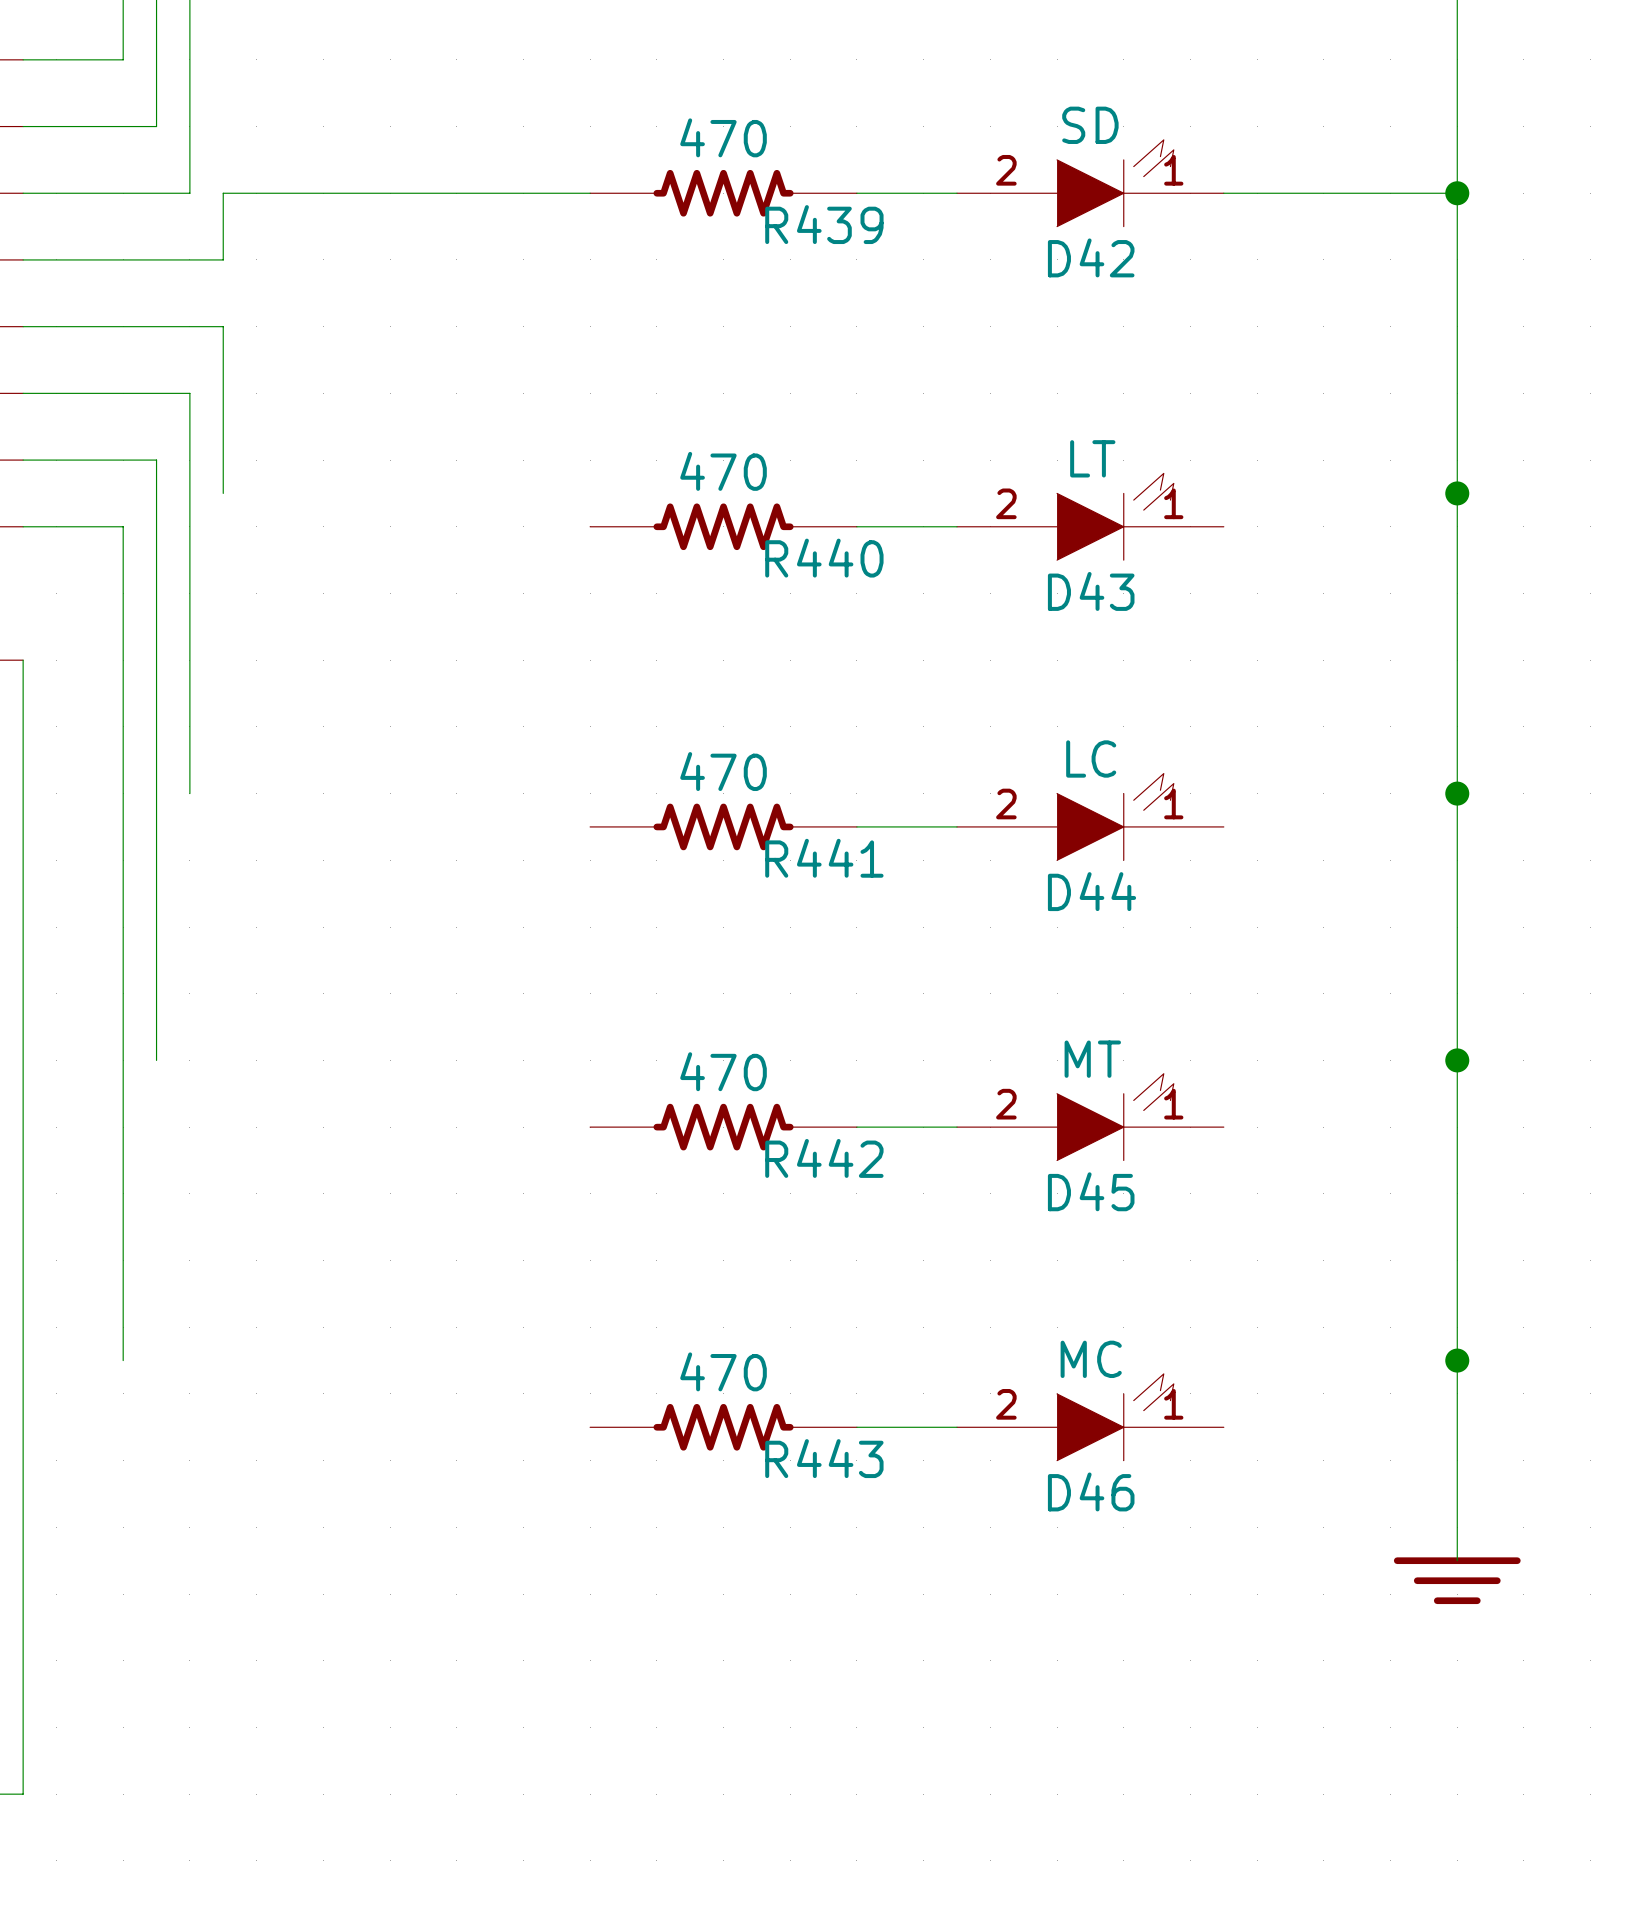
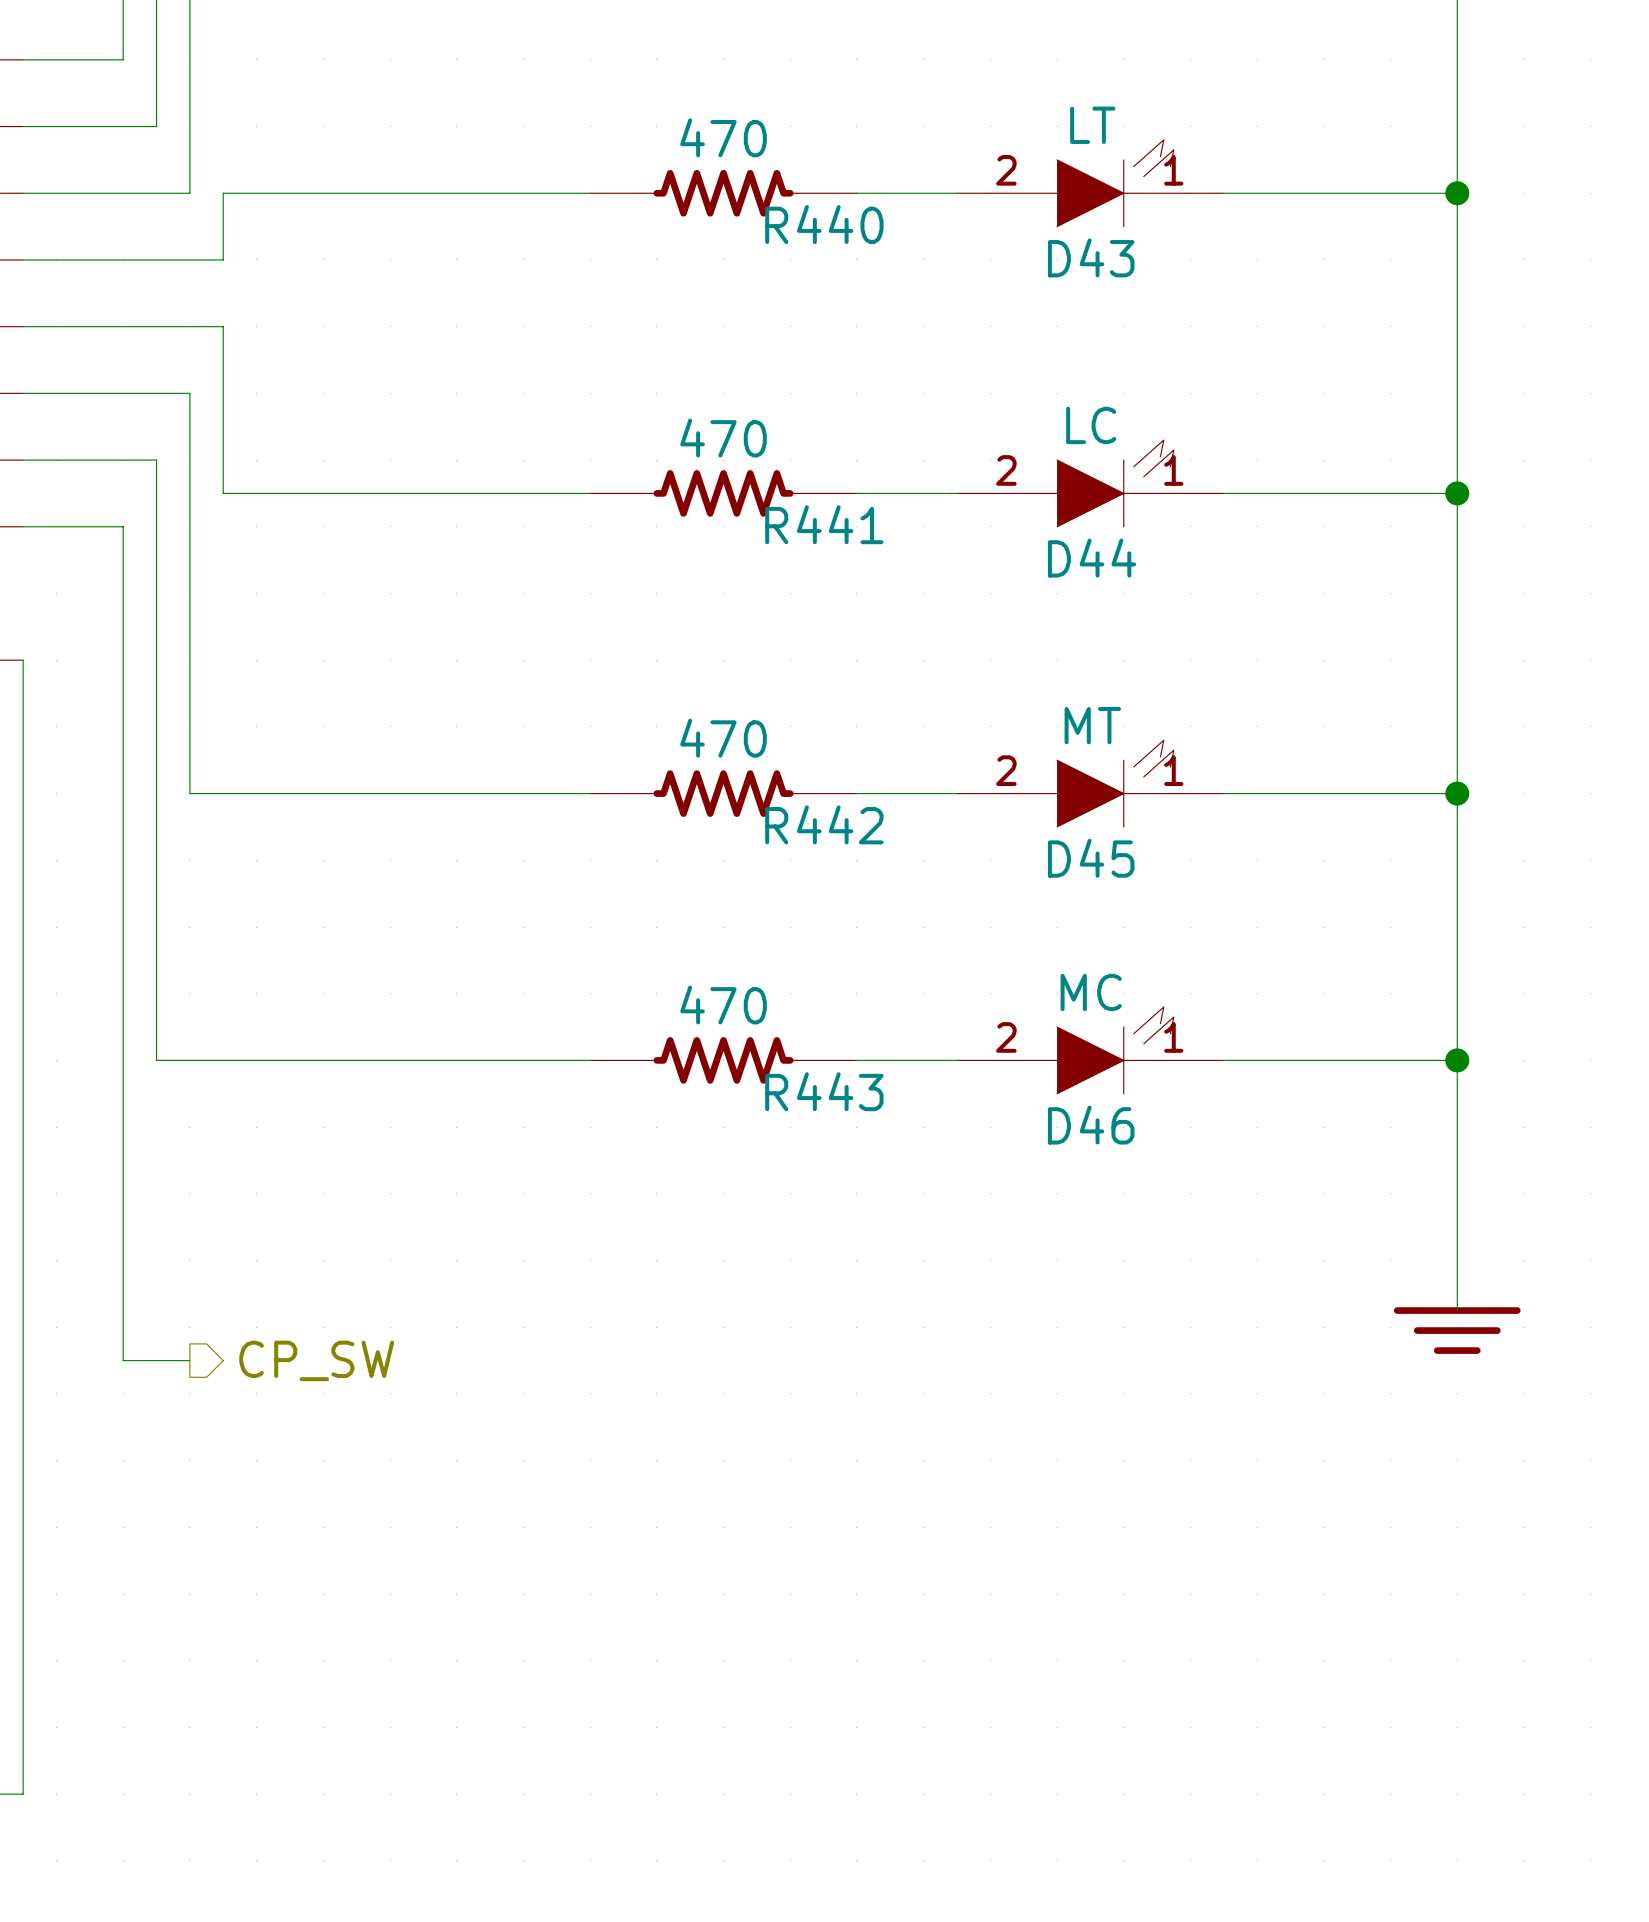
D42 value: SD (1090, 125) -> LT (1092, 125)
R439 name: R439 (824, 224) -> R440 (824, 224)
D42 name: D42 (1091, 257) -> D43 (1091, 257)
wire: none -> (223, 493) (590, 493)
wire: none -> (1223, 493) (1457, 493)
D43: LT (1090, 516) -> none
R440: 470 (723, 526) -> none
wire: (856, 526) (956, 526) -> (856, 493) (956, 493)
wire: none -> (189, 793) (590, 793)
wire: none -> (1223, 793) (1457, 793)
D44 position: (1090, 816) -> (1090, 483)
R441 position: (723, 826) -> (723, 493)
wire: (856, 826) (956, 826) -> (856, 793) (956, 793)
wire: none -> (156, 1060) (590, 1060)
wire: none -> (1223, 1060) (1457, 1060)
D45 position: (1090, 1117) -> (1090, 783)
R442 position: (723, 1127) -> (723, 793)
wire: (856, 1127) (956, 1127) -> (856, 1060) (956, 1060)
wire: (1457, 1310) (1457, 1560) -> none
wire: none -> (123, 1360) (189, 1360)
hierarchical label: none -> CP_SW (316, 1360)
junction: (1457, 1360) -> none
D46 position: (1090, 1417) -> (1090, 1050)
R443 position: (723, 1427) -> (723, 1060)
wire: (856, 1427) (956, 1427) -> none
power symbol position: (1457, 1580) -> (1457, 1330)

